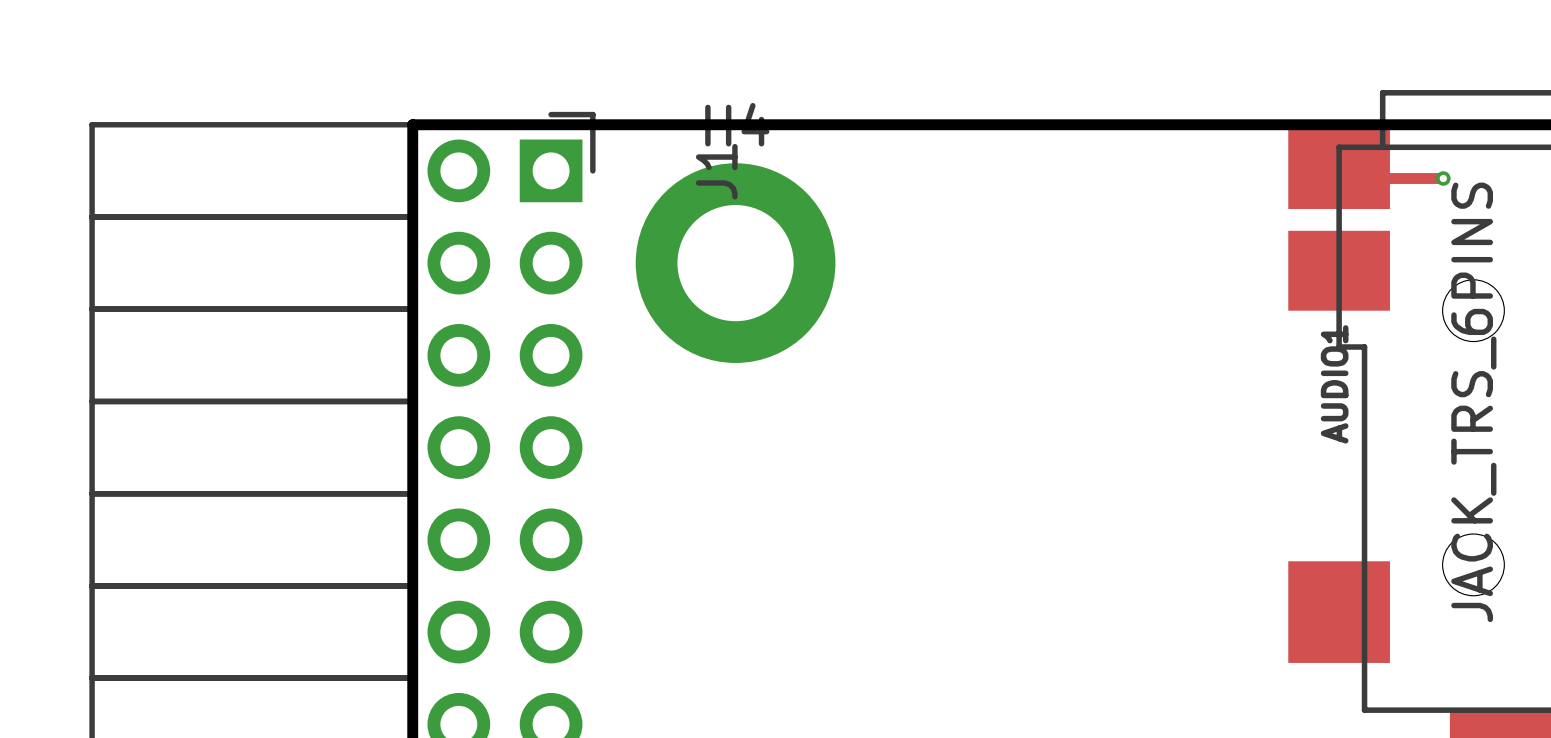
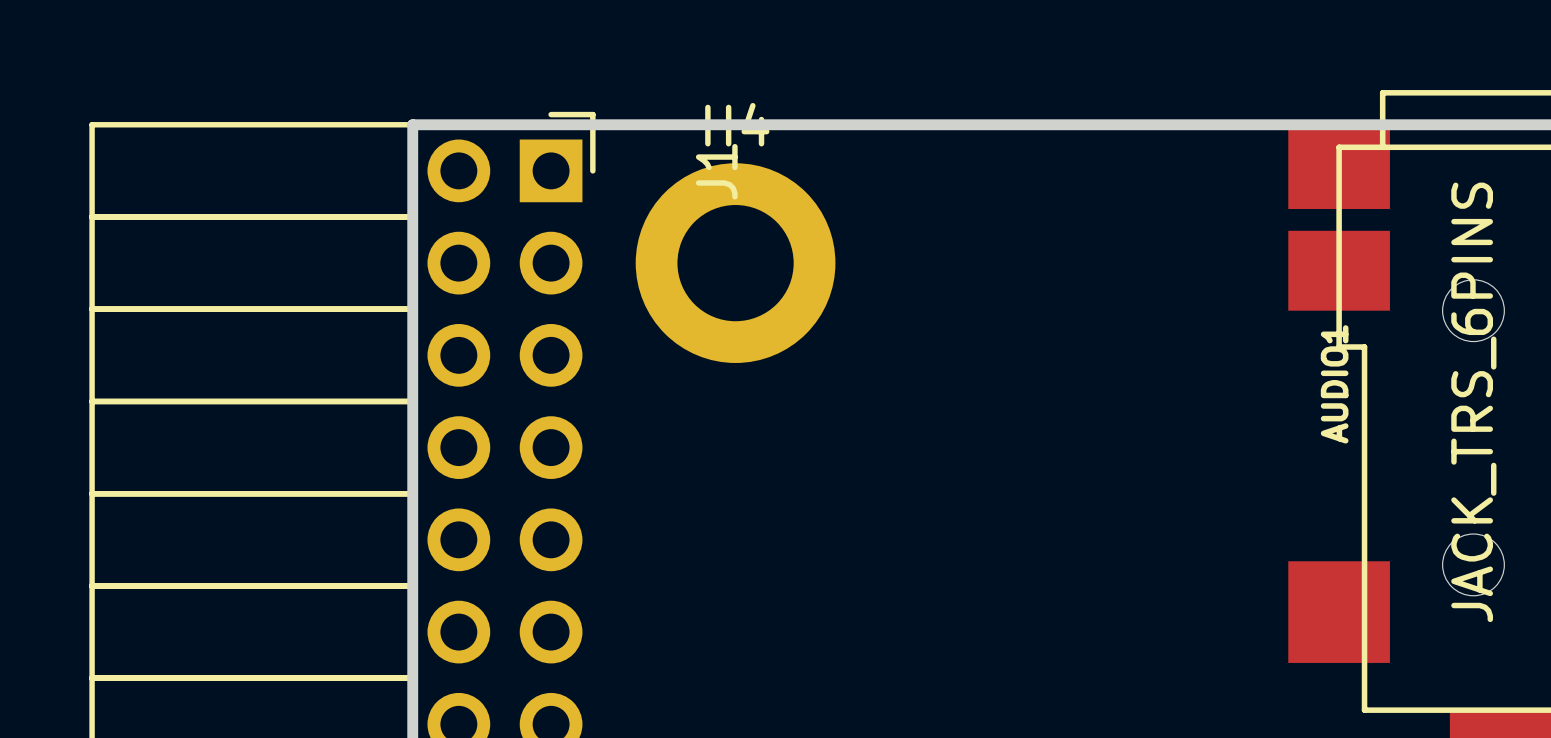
track: (1339, 169) (1348, 178) (1443, 178) -> none
via: (1443, 178) -> none

